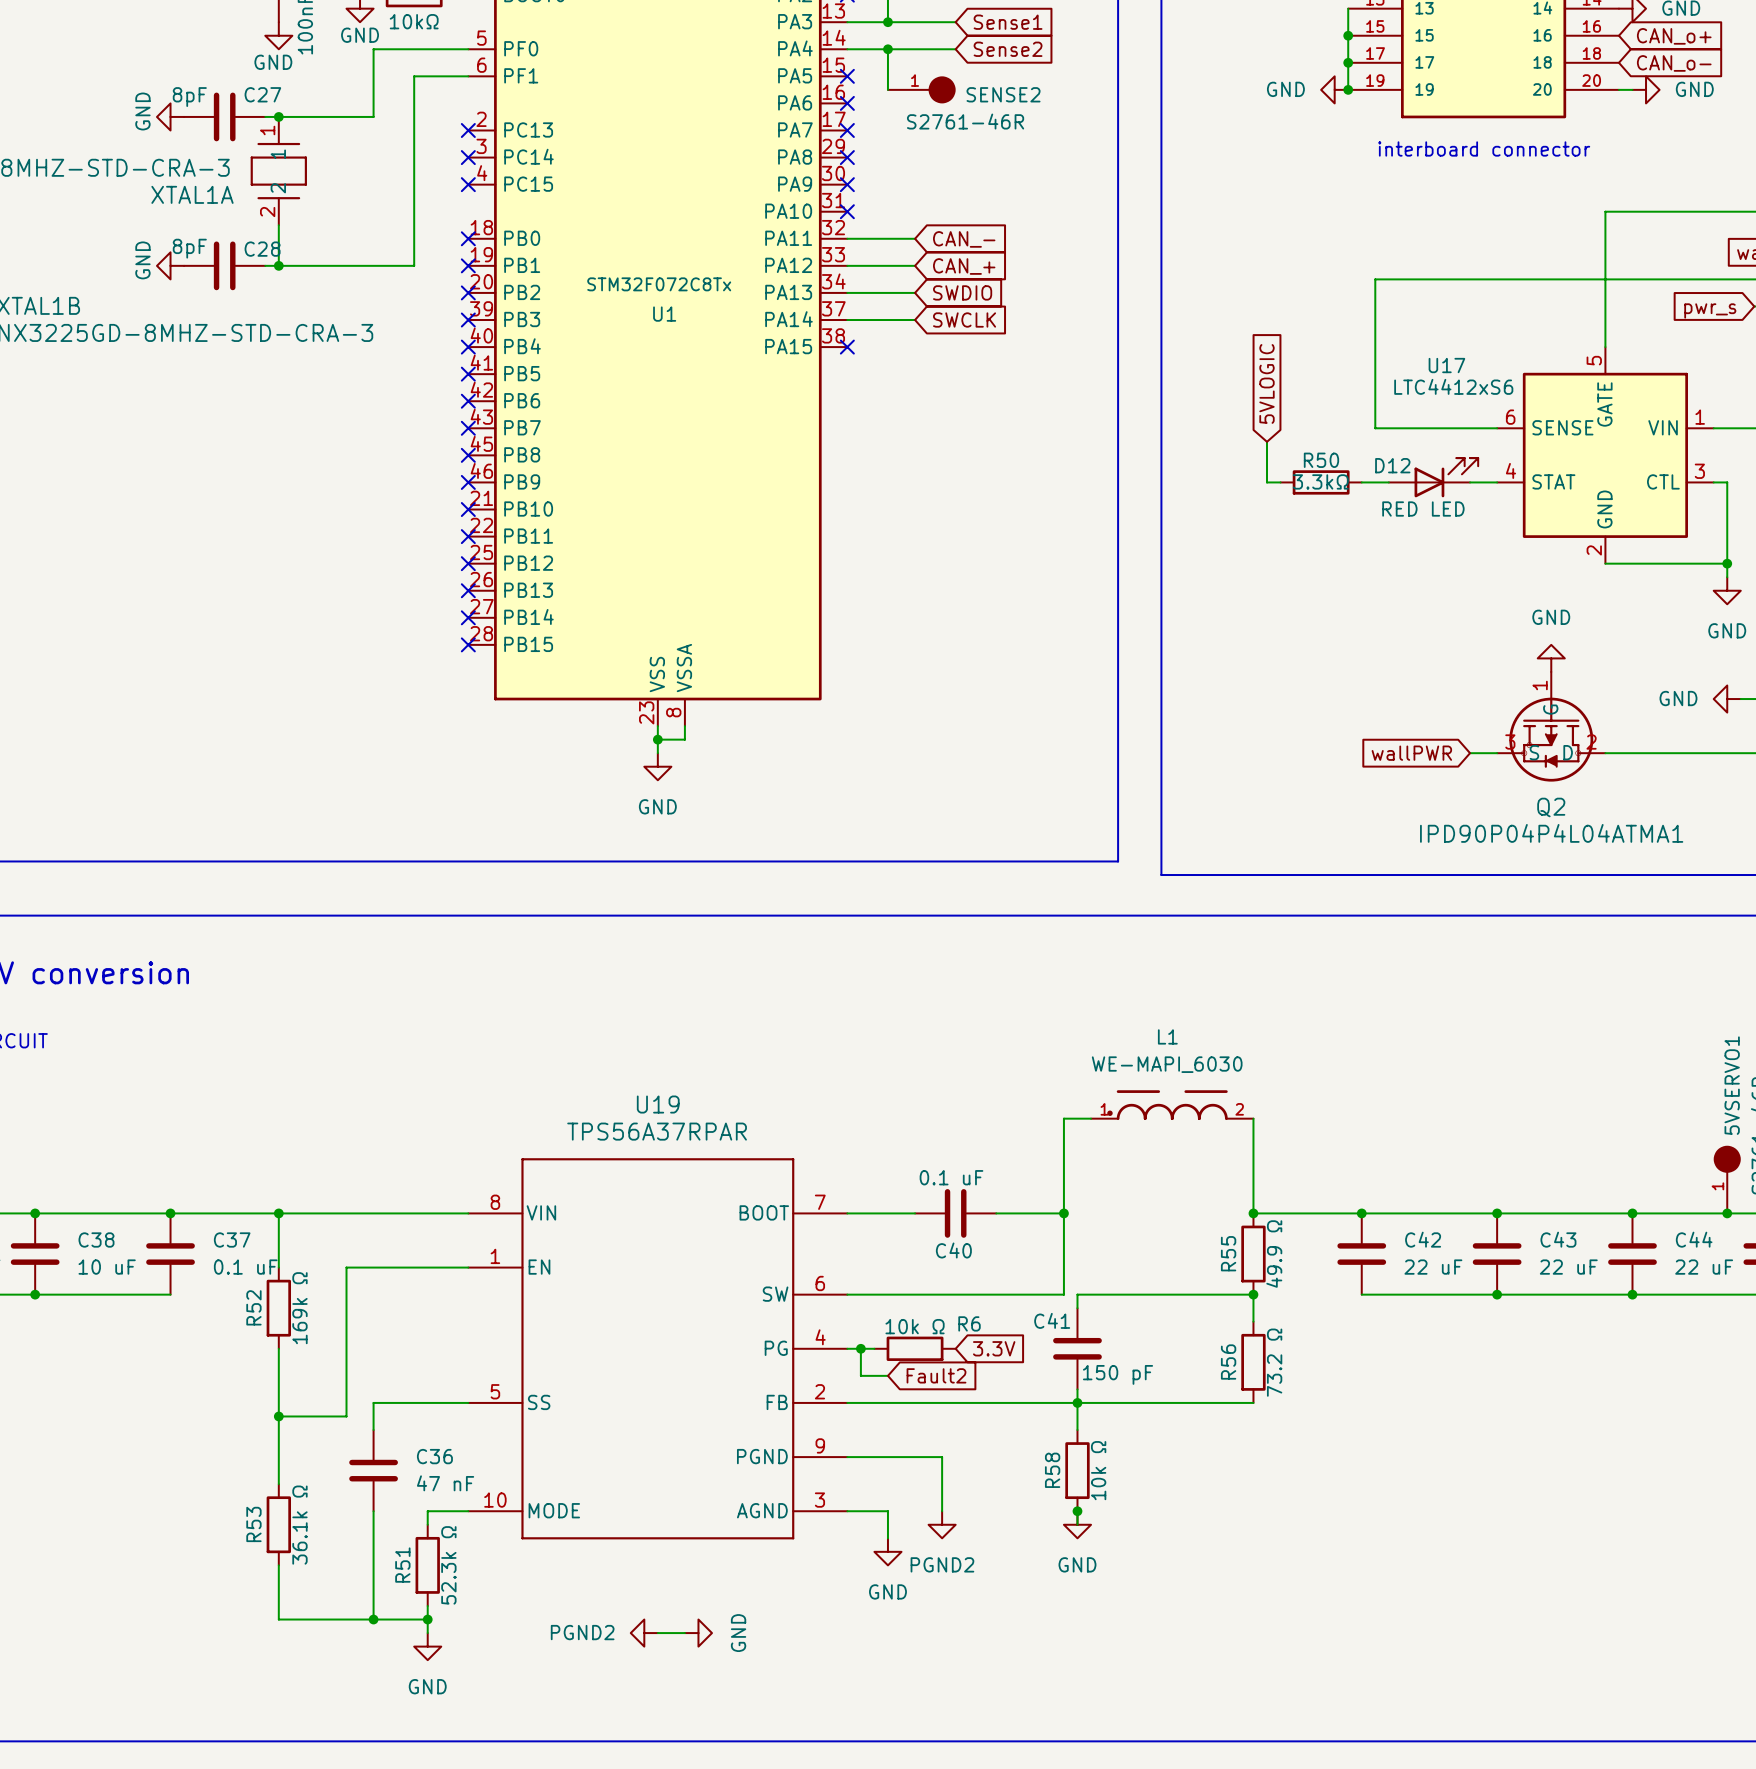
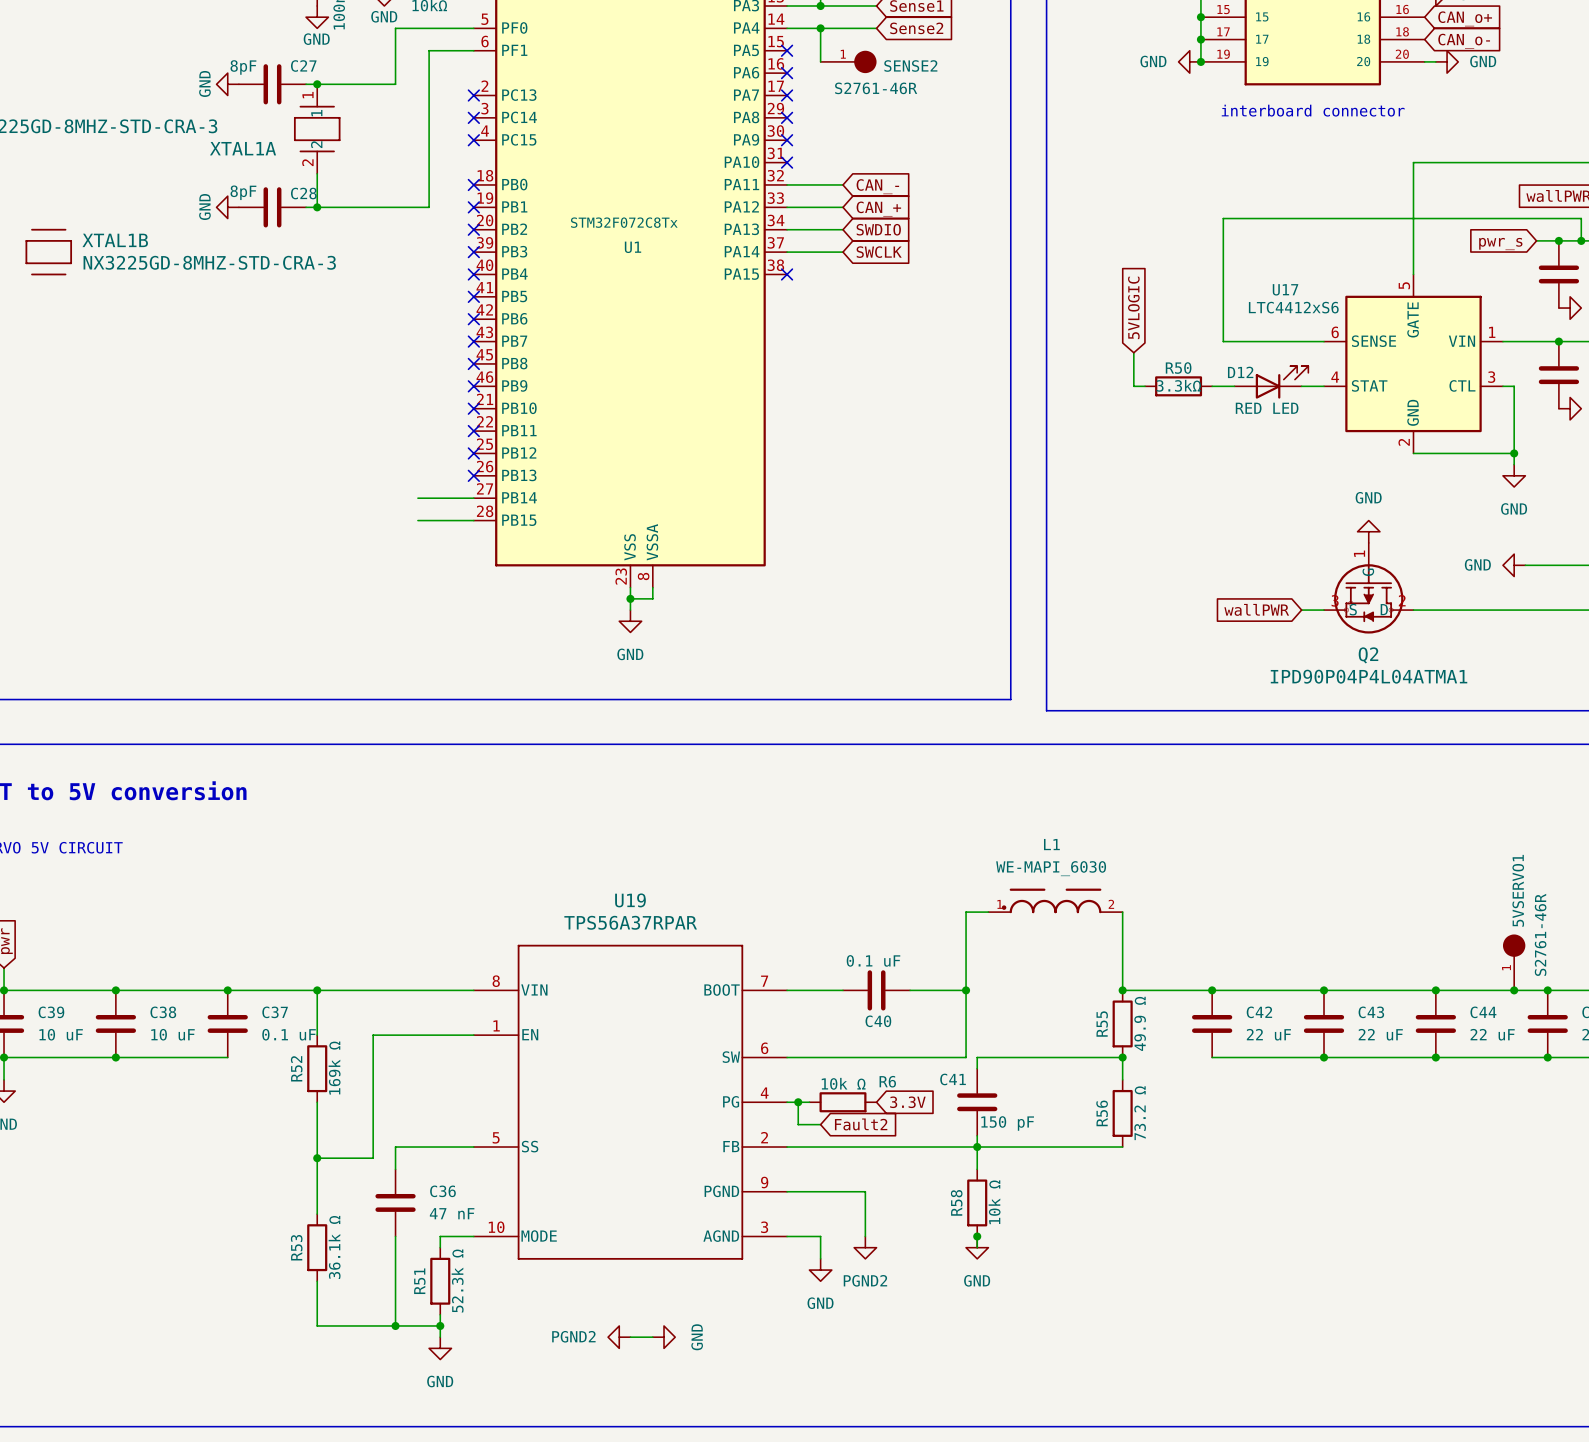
wire: none -> (417, 498) (473, 498)
no-connect mark: (468, 617) -> none
wire: none -> (417, 520) (473, 520)
no-connect mark: (468, 644) -> none

